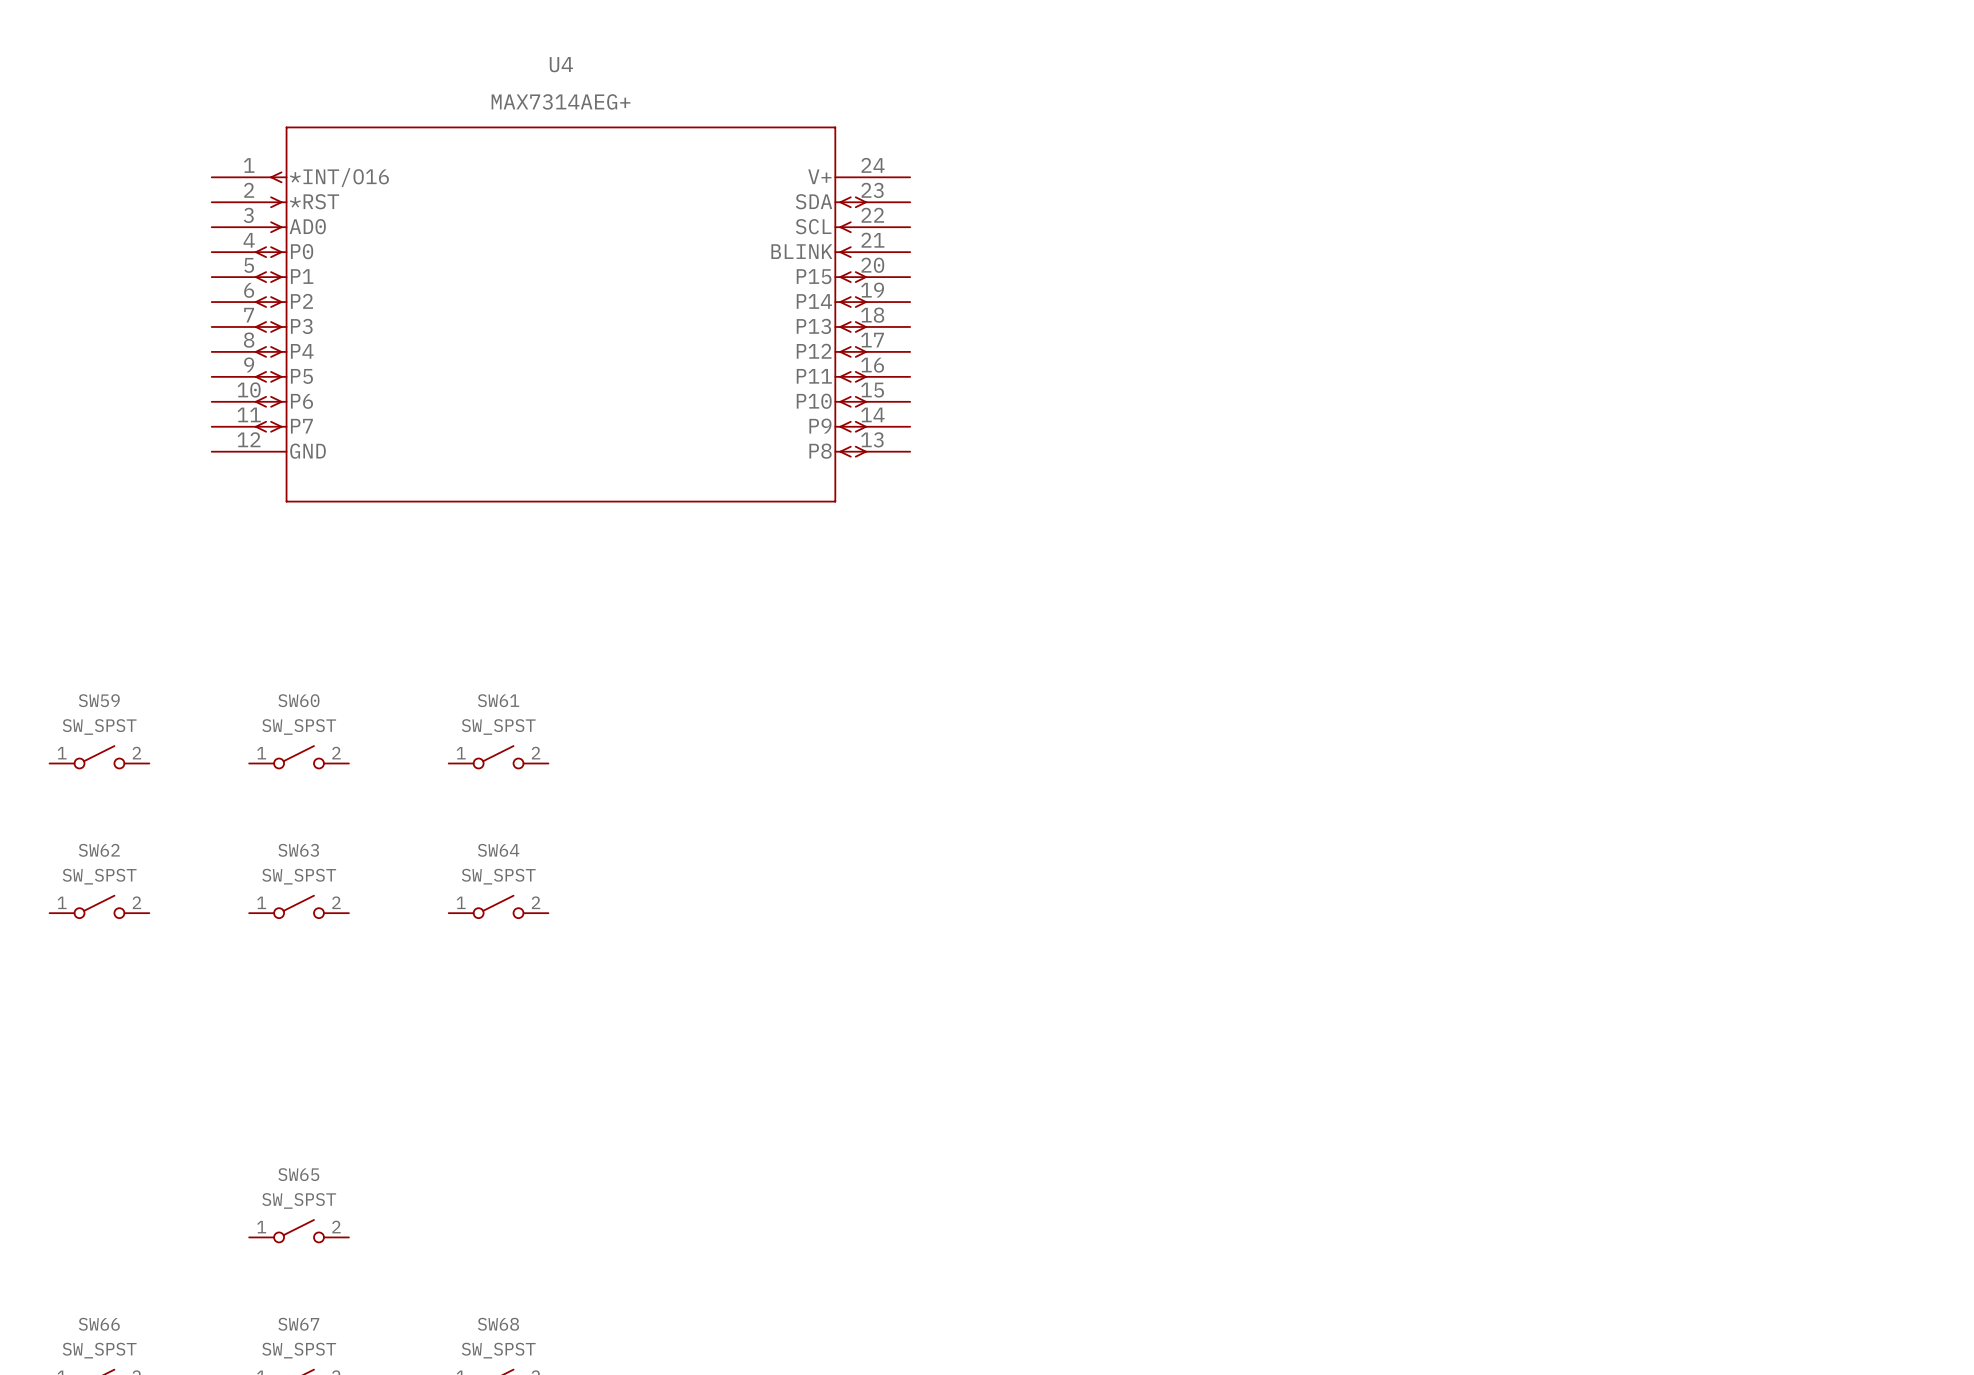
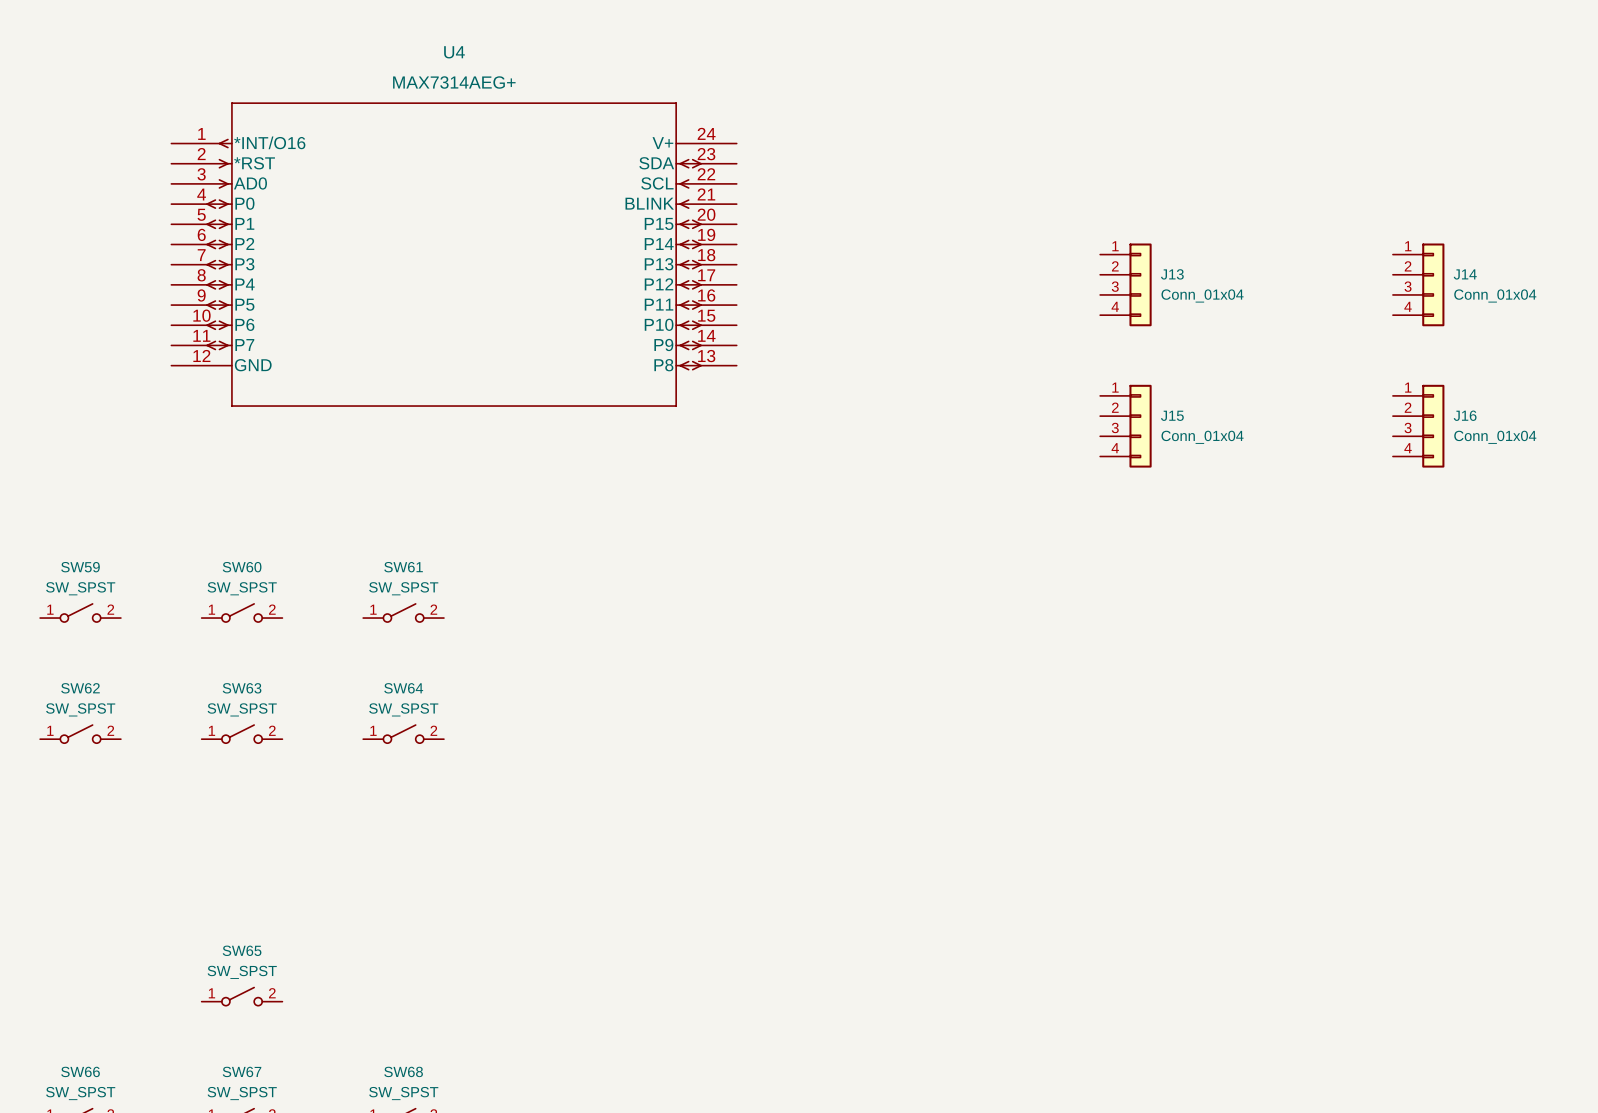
J13: none -> Conn_01x04 (1125, 284)
J14: none -> Conn_01x04 (1418, 284)
J15: none -> Conn_01x04 (1125, 426)
J16: none -> Conn_01x04 (1418, 426)

